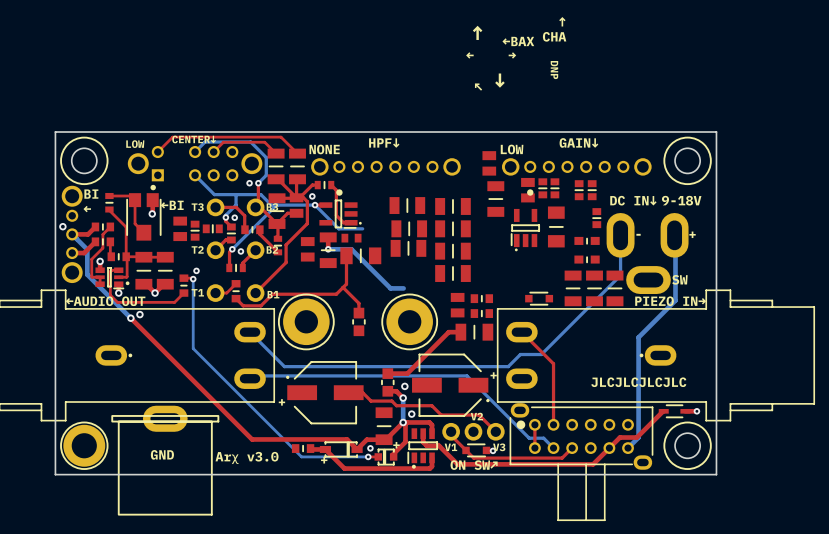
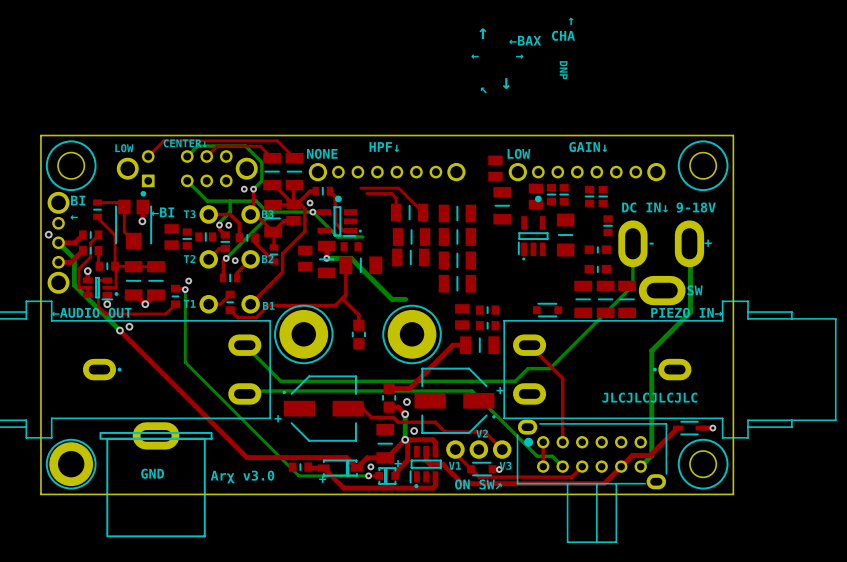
top track: none -> (360, 188) (398, 188) (423, 212)
top track: none -> (366, 193) (391, 193) (396, 198) (396, 212)

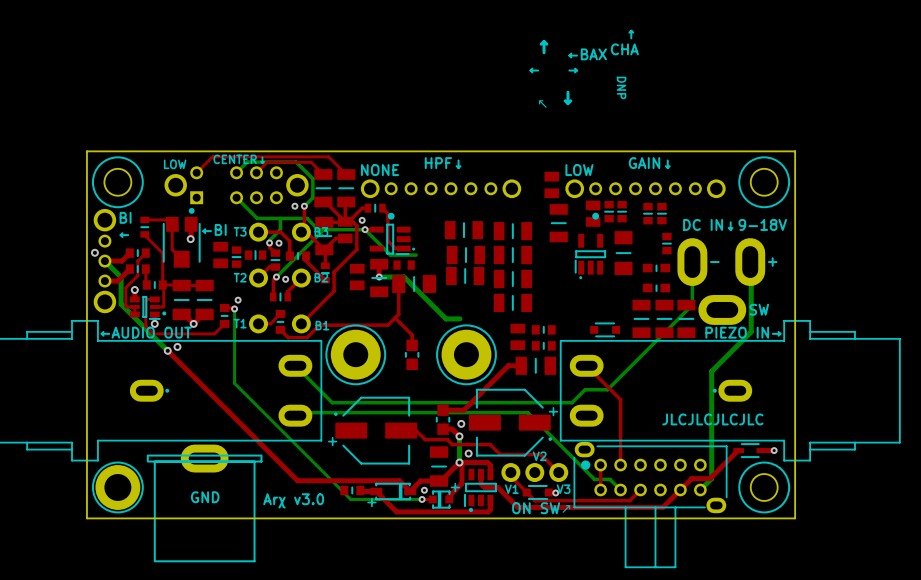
top track: (360, 188) (398, 188) (423, 212) -> none
top track: (366, 193) (391, 193) (396, 198) (396, 212) -> none

